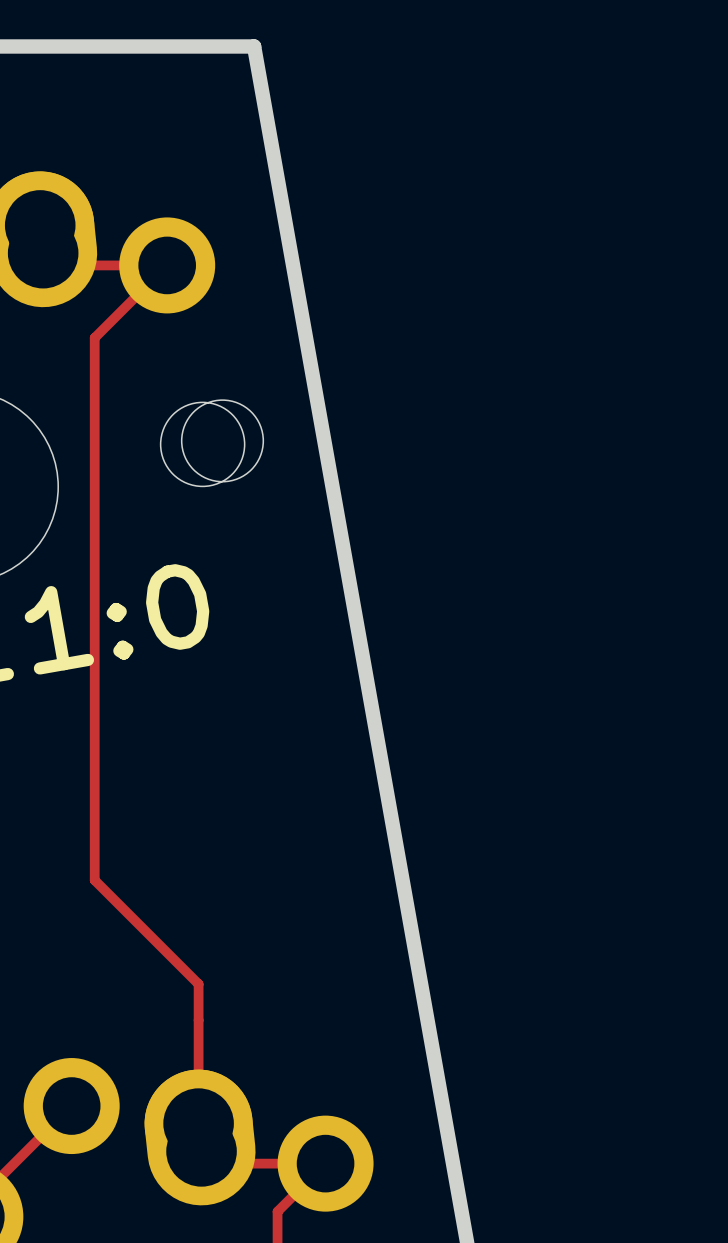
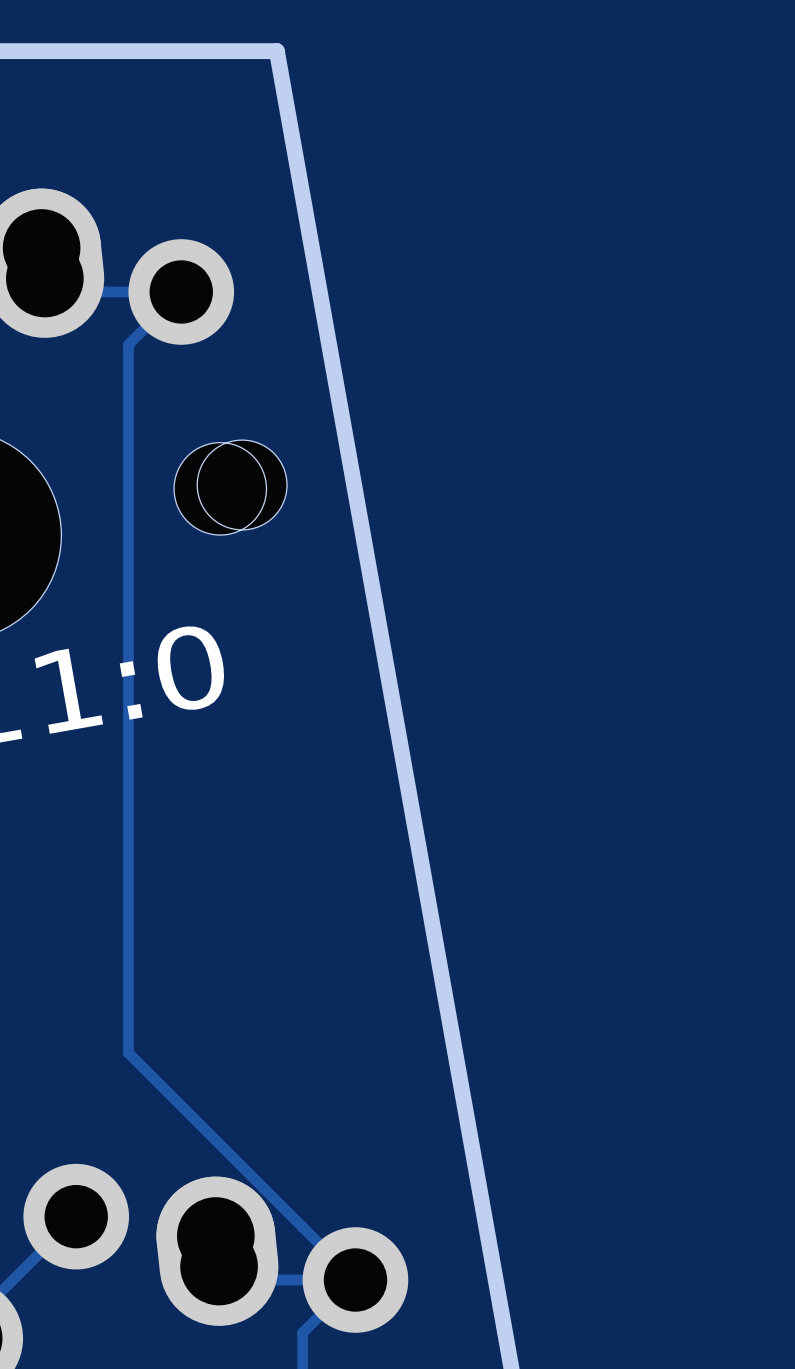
track: (119, 313) (94, 337) (94, 880) (198, 984) (198, 1148) (201, 1151) -> (128, 344) (128, 1053) (355, 1280)

